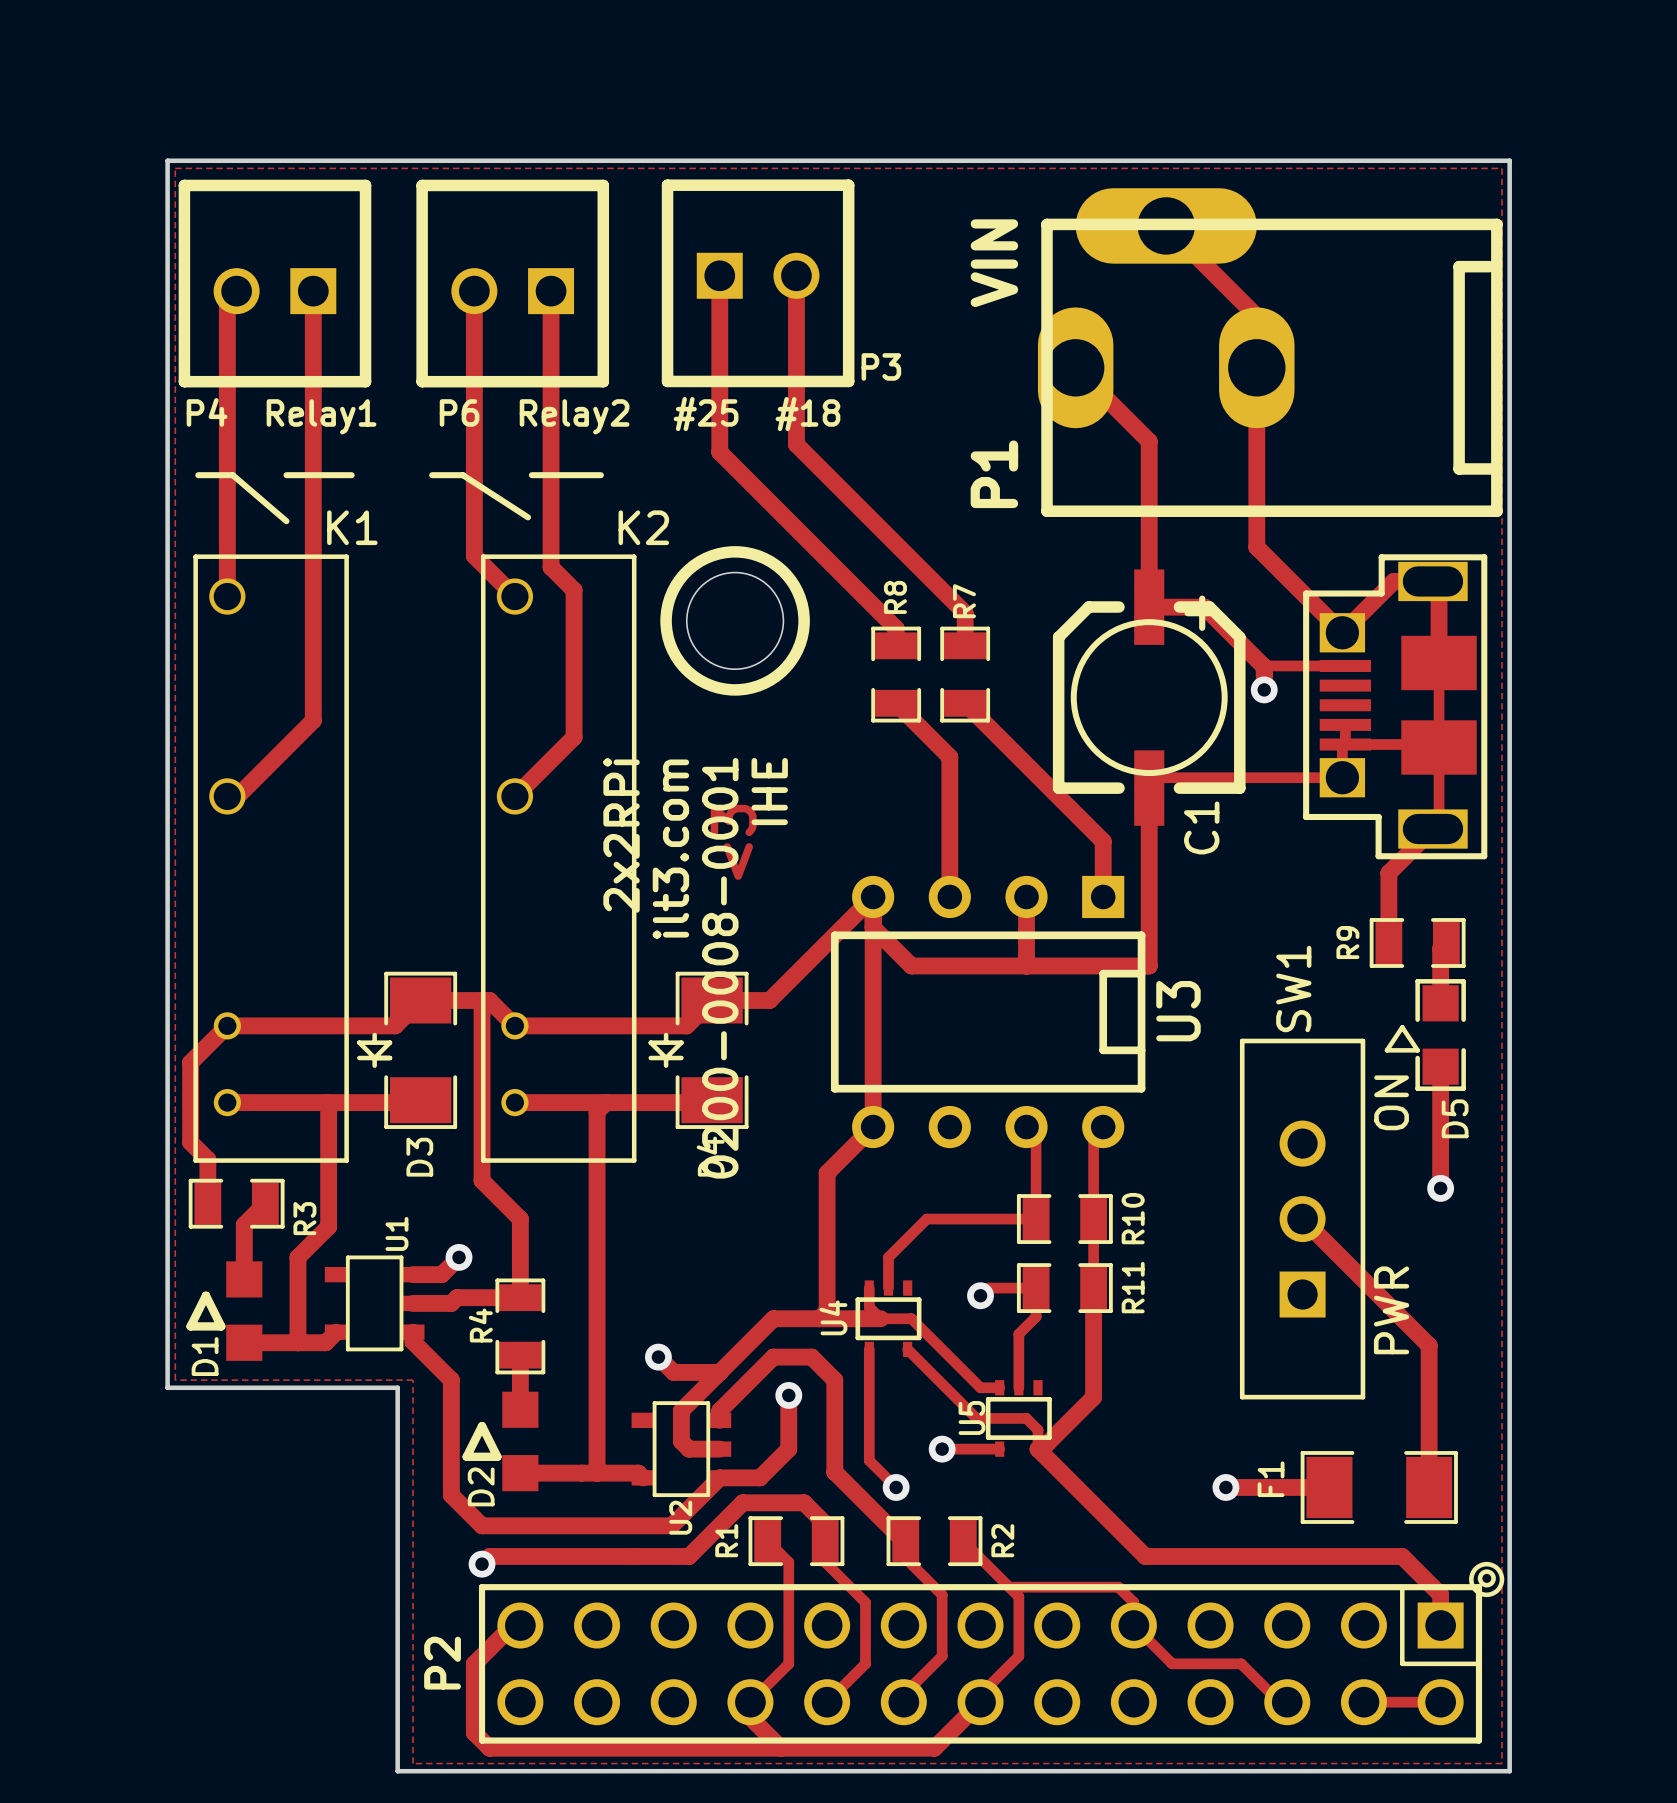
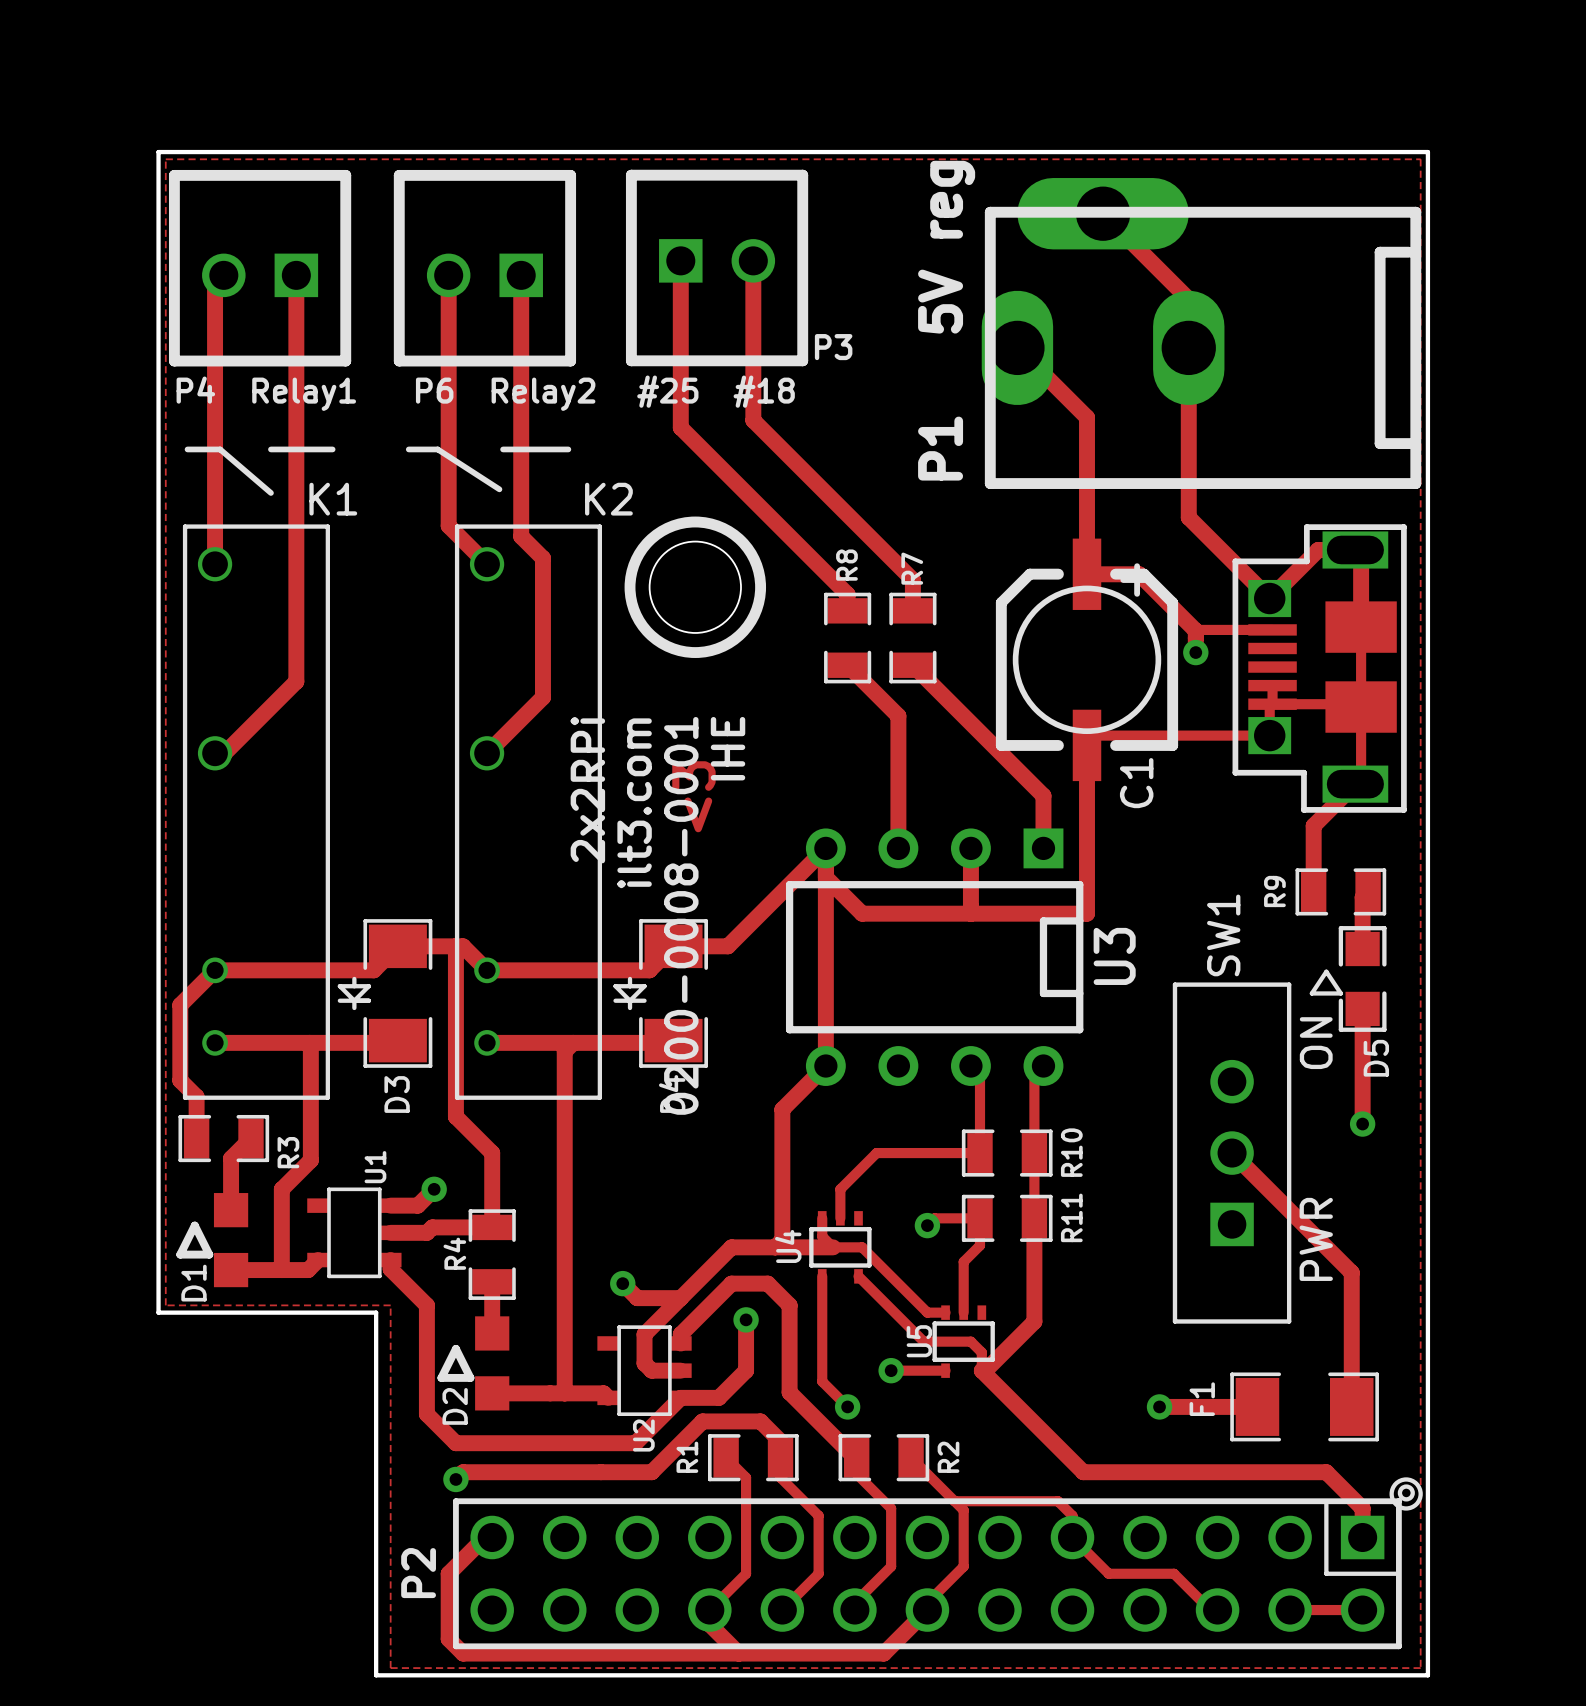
P1 value: VIN (994, 263) -> 5V reg (946, 247)

